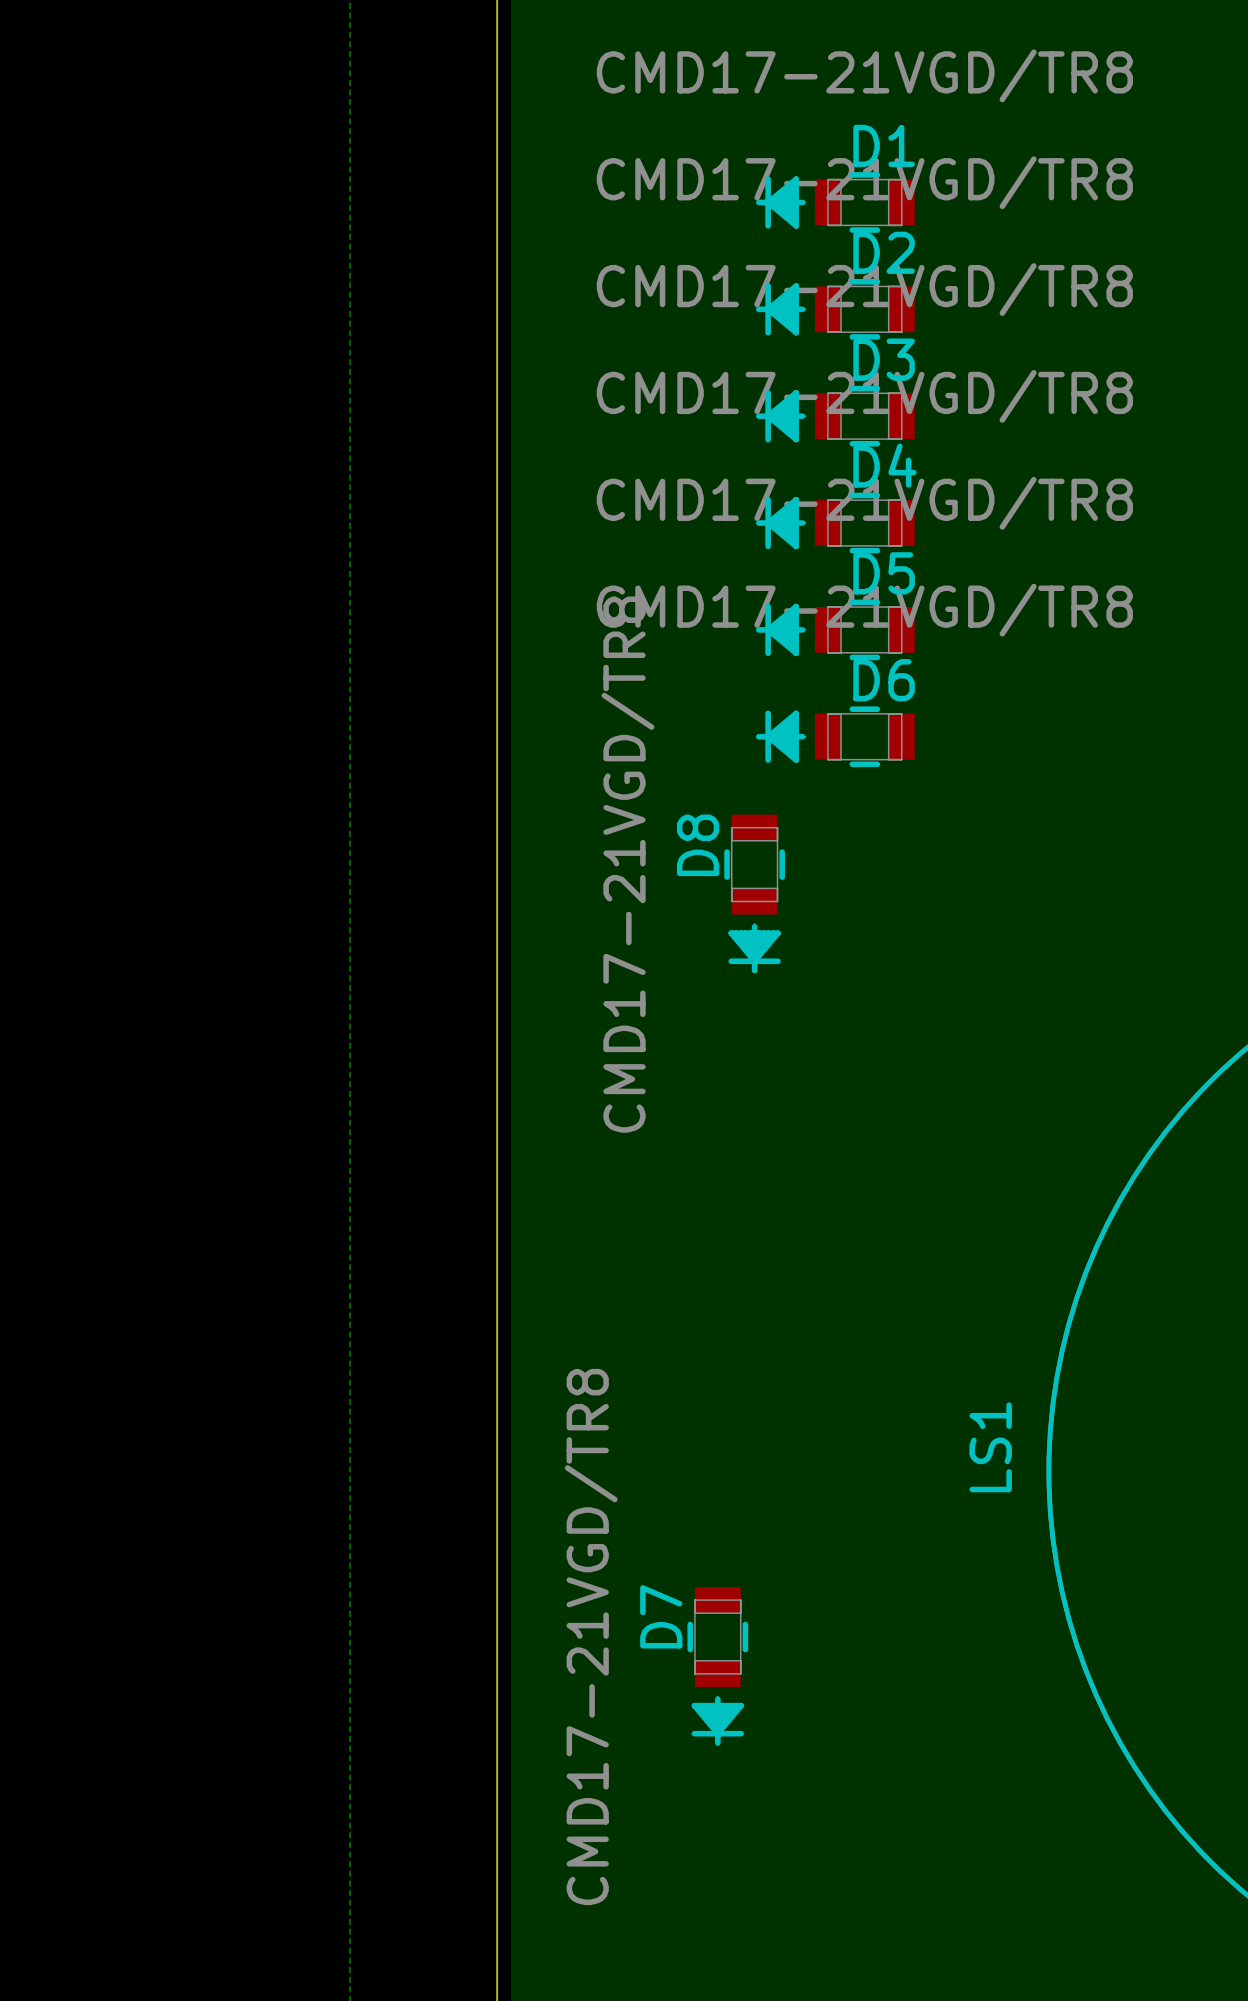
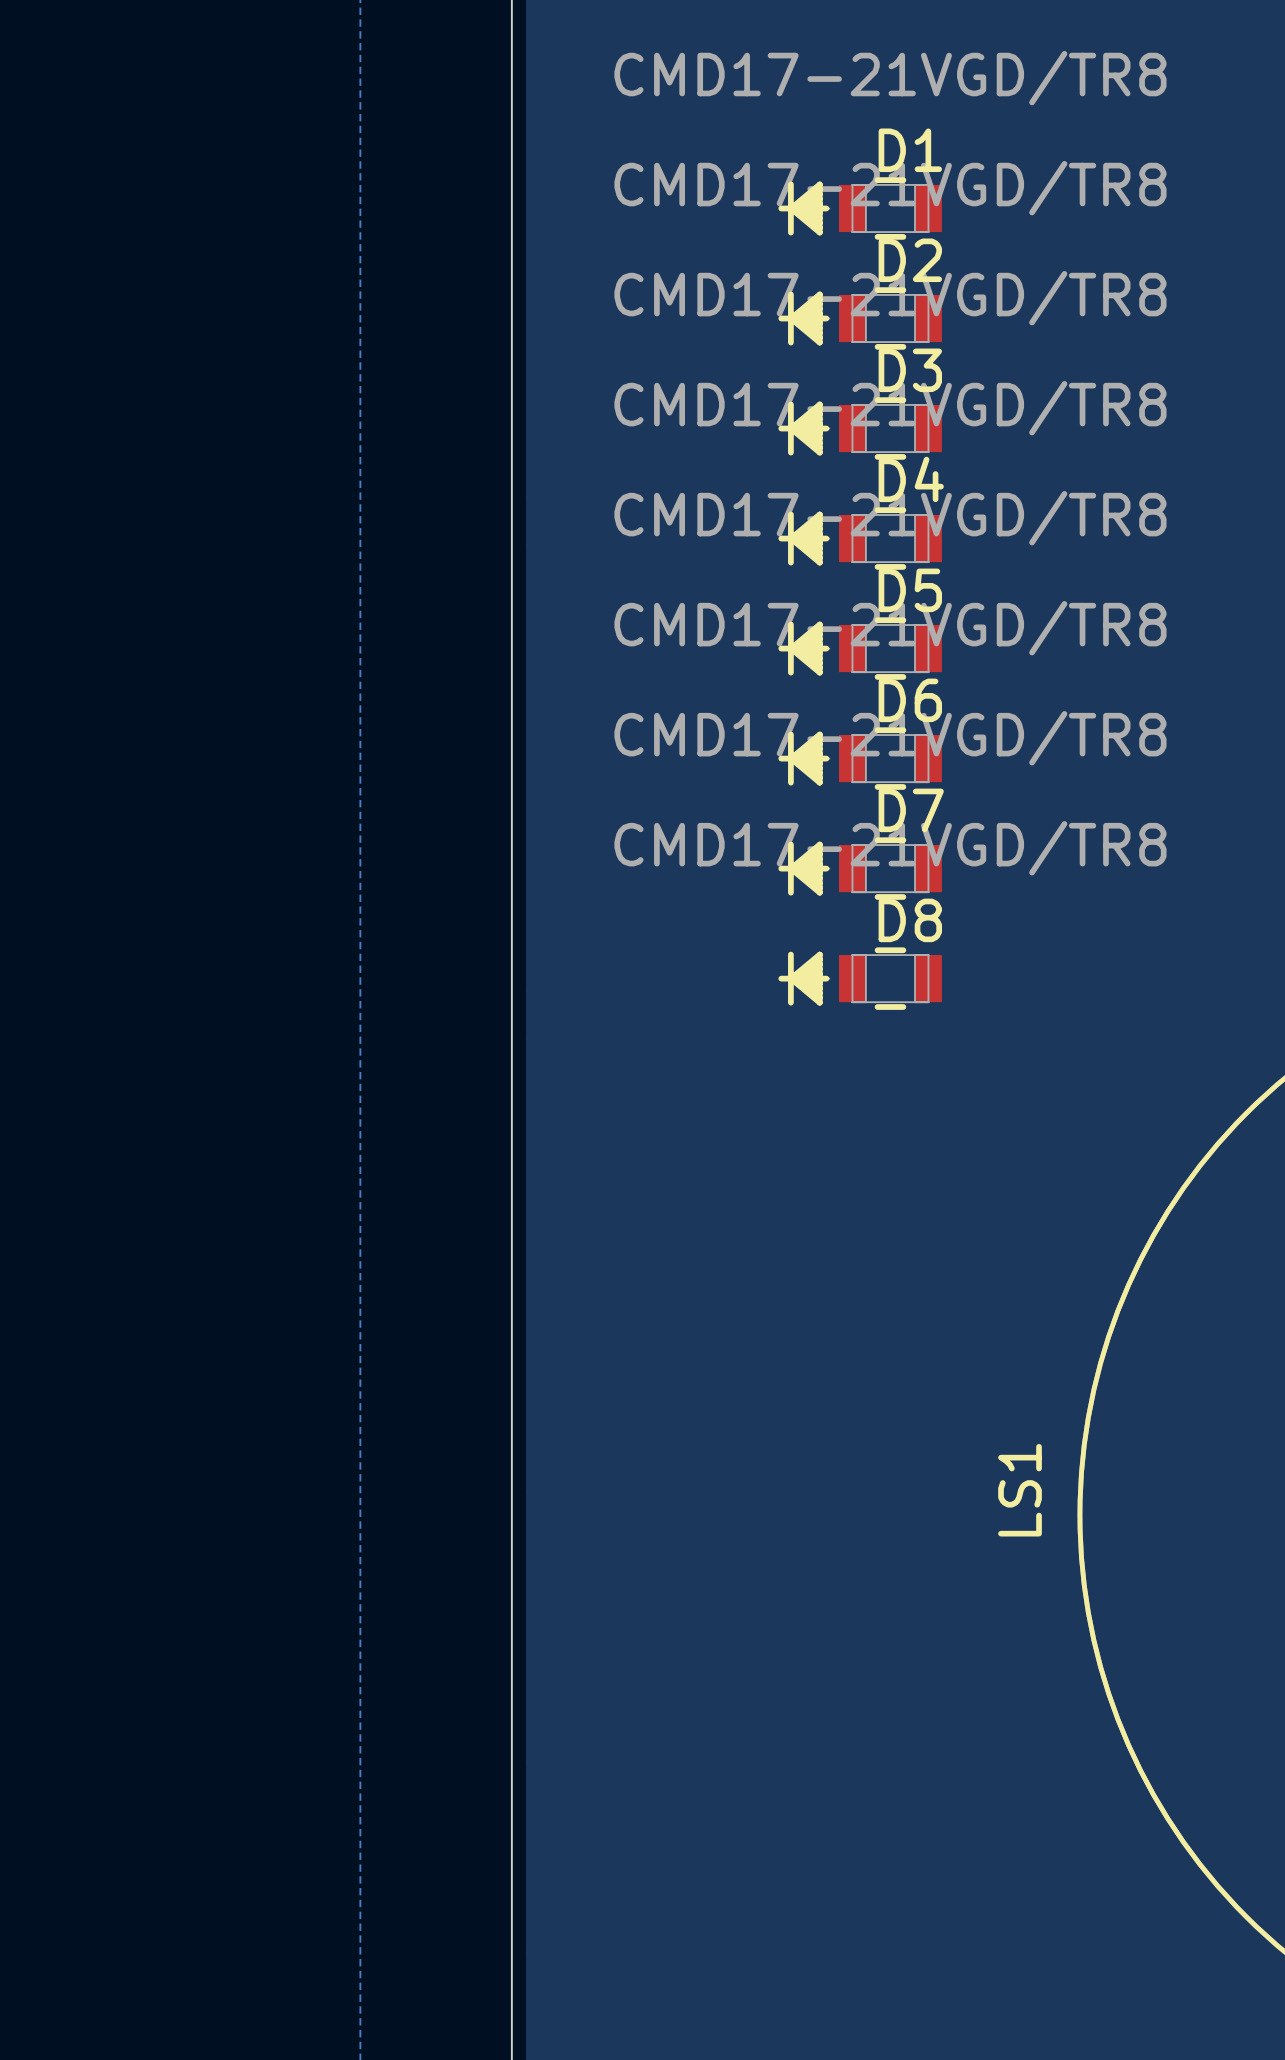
D8 rotation: 0° (754, 894) -> 90° clockwise (860, 978)
D8 position: (754, 894) -> (860, 978)
D7 rotation: 0° (717, 1666) -> 90° clockwise (860, 868)
D7 position: (717, 1666) -> (860, 868)

